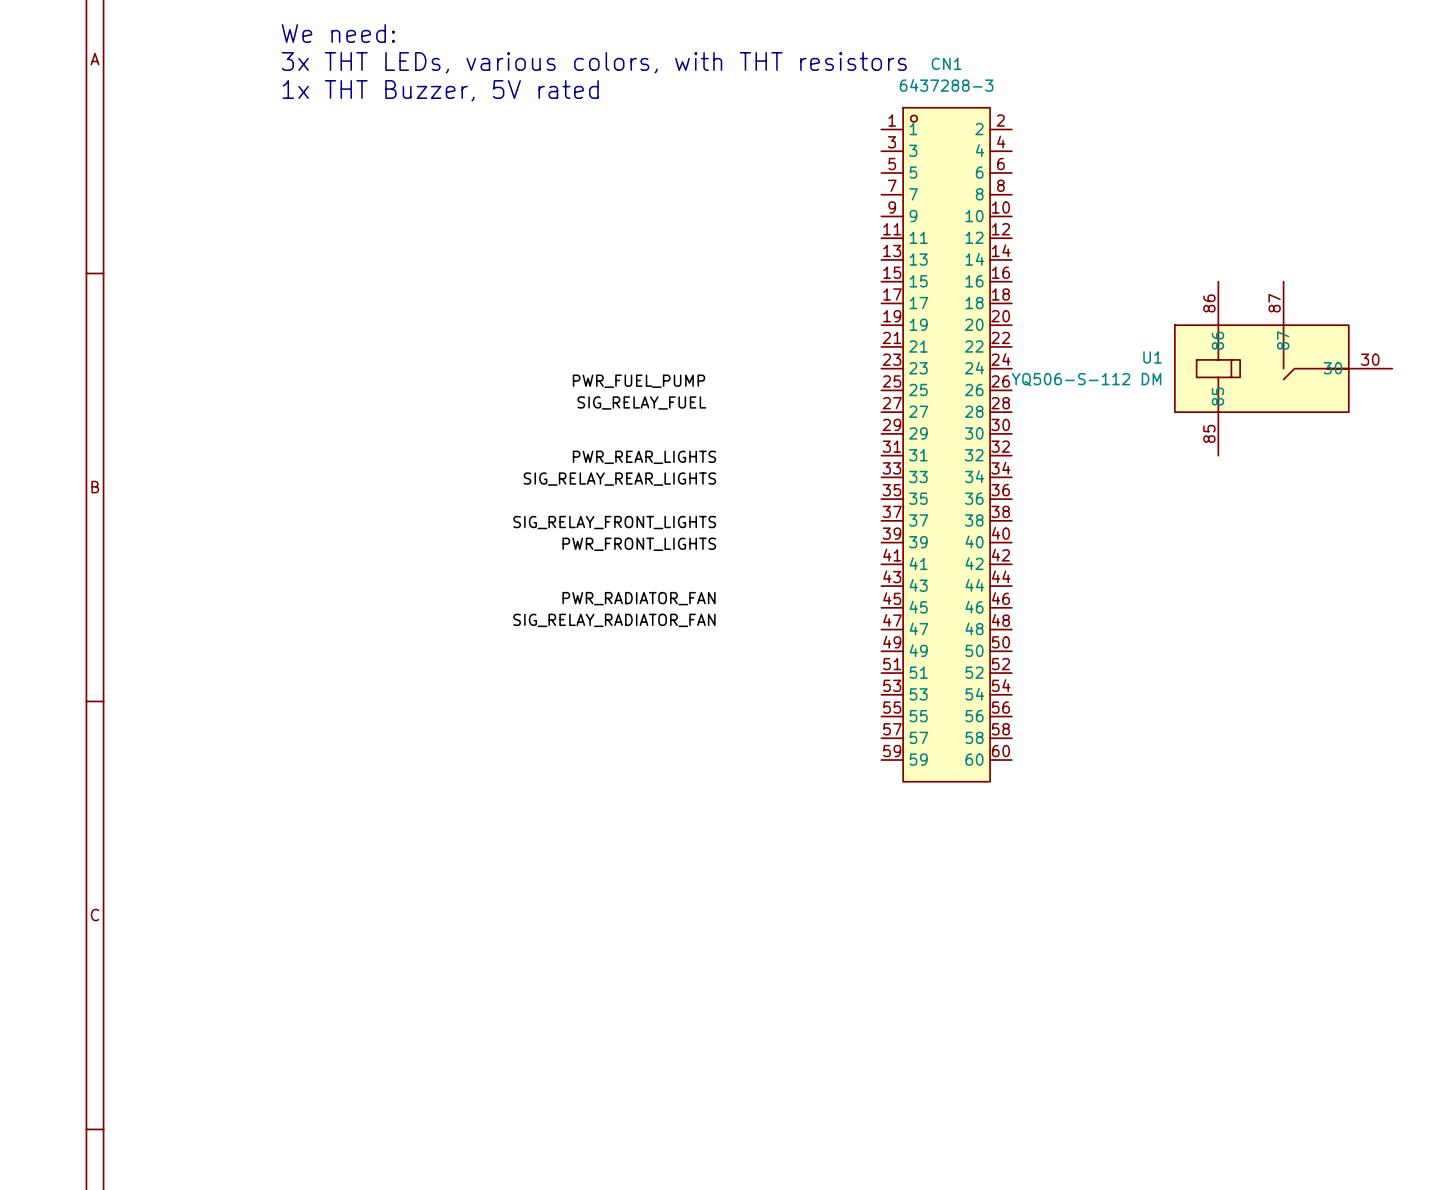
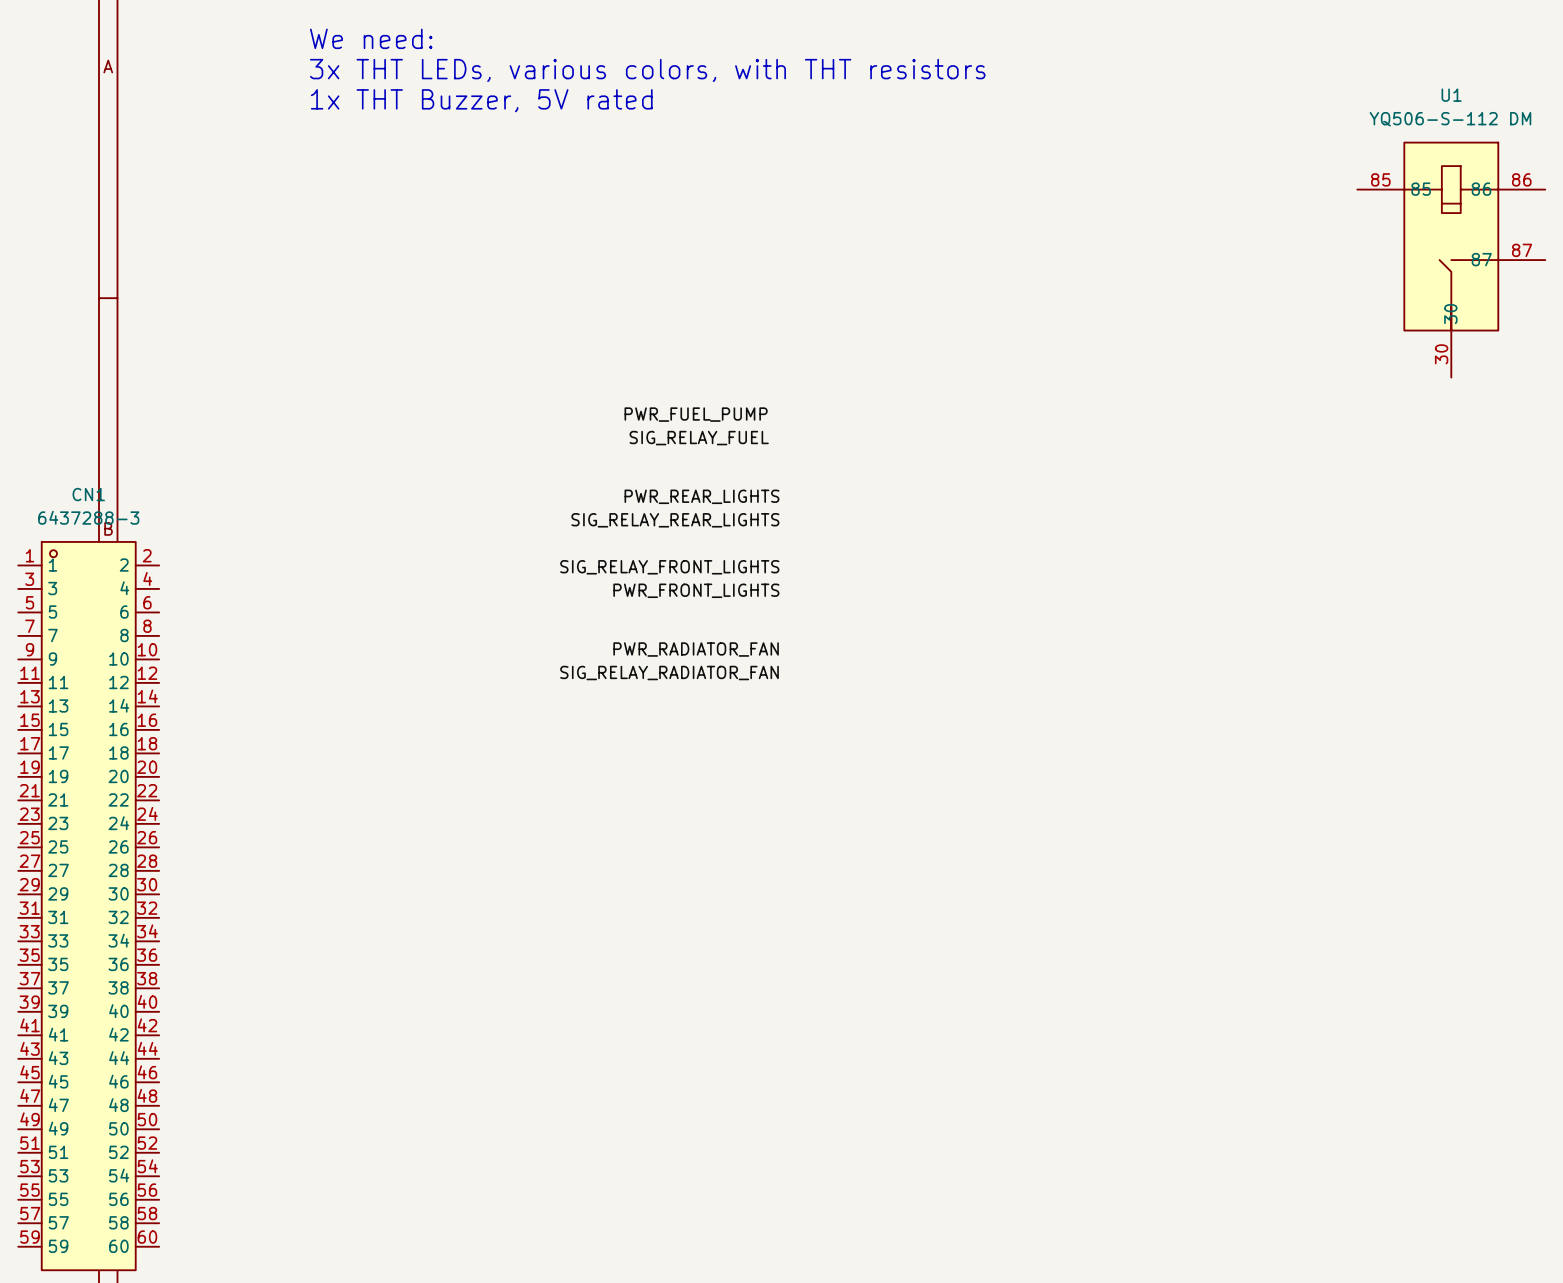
U1 name position: U1 (1152, 357) -> U1 (1451, 95)
U1 rotation: 0° (1261, 368) -> 90° clockwise (1451, 236)
U1 position: (1283, 368) -> (1451, 260)
U1 value position: YQ506-S-112 DM (1086, 379) -> YQ506-S-112 DM (1450, 119)
CN1 position: (946, 444) -> (88, 906)

